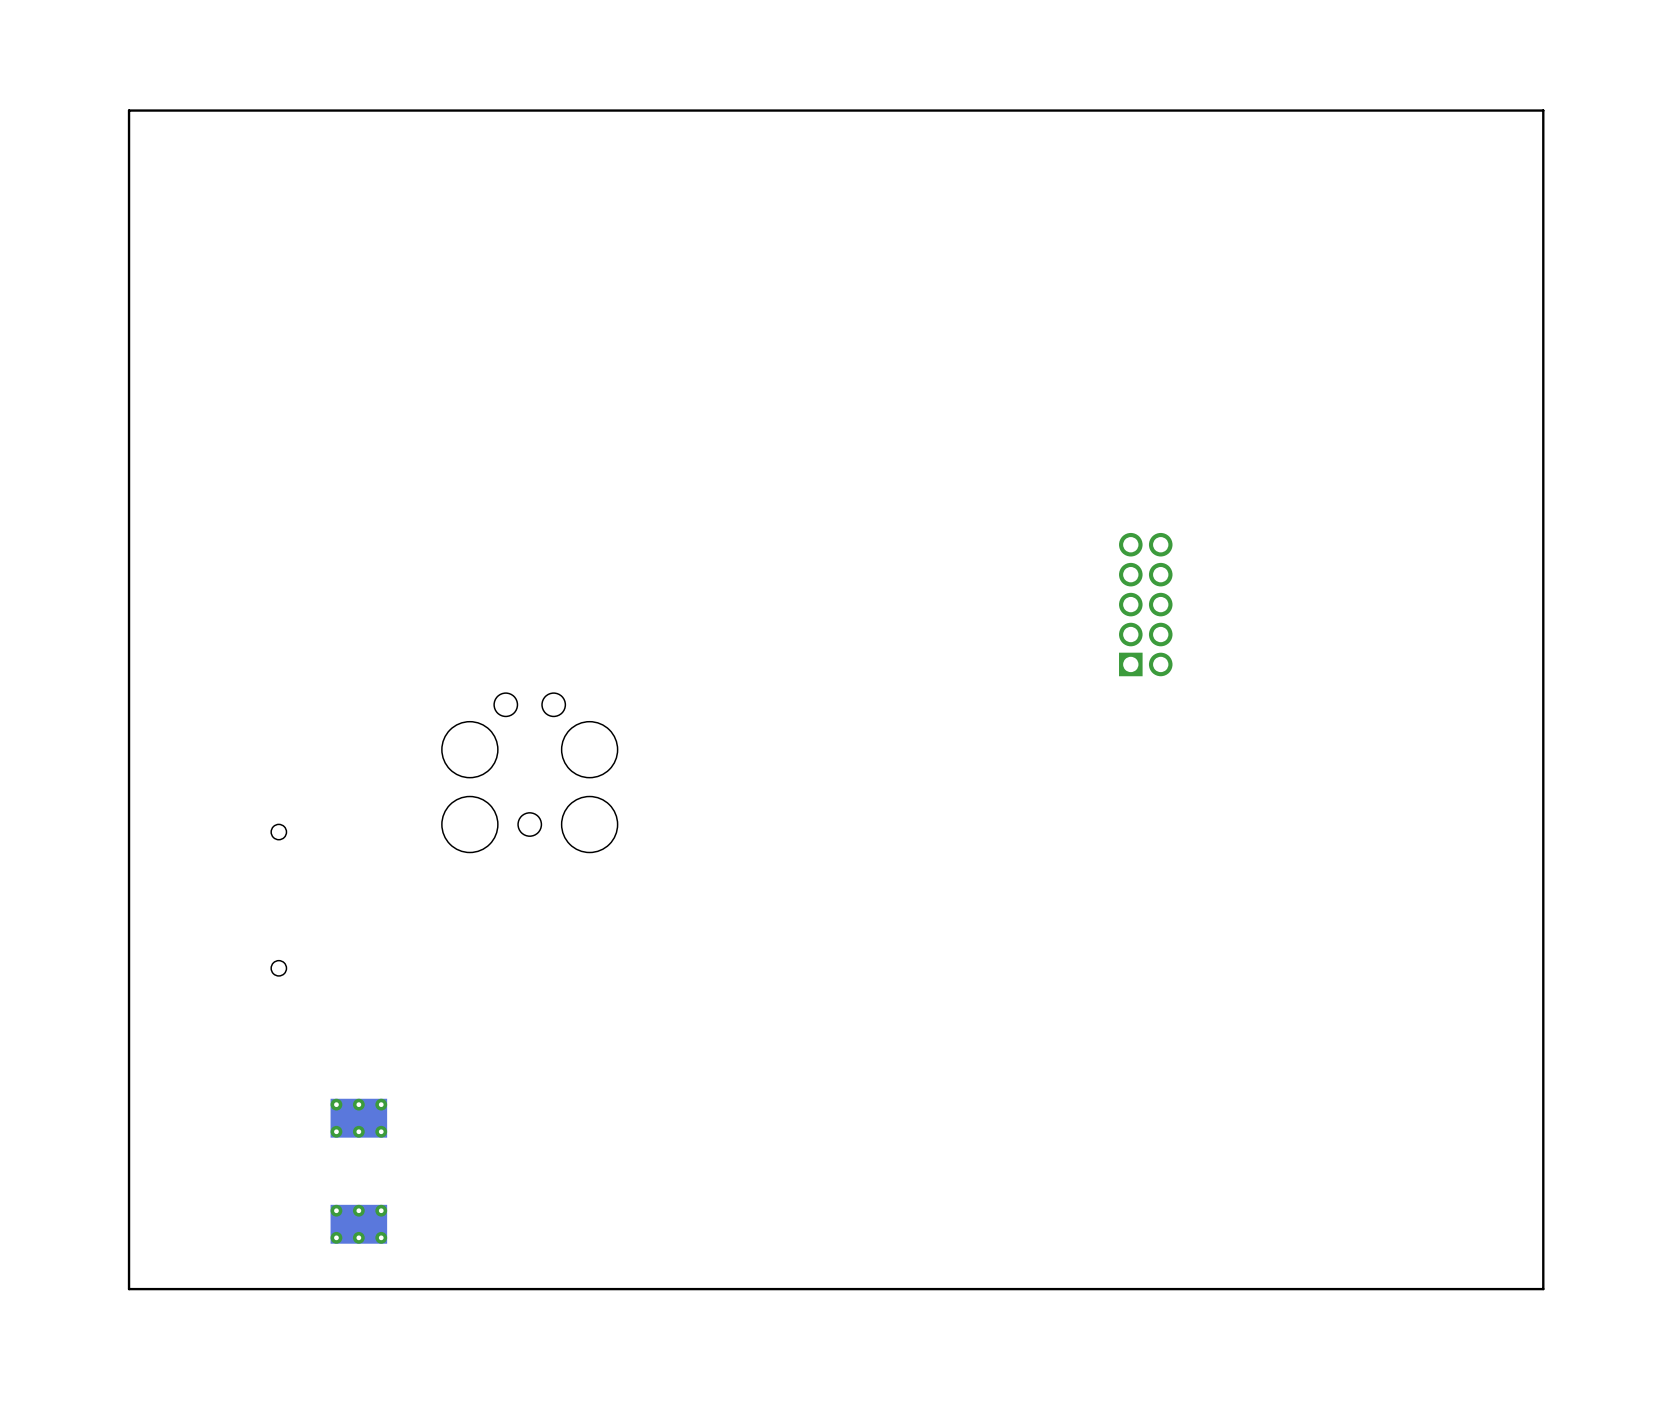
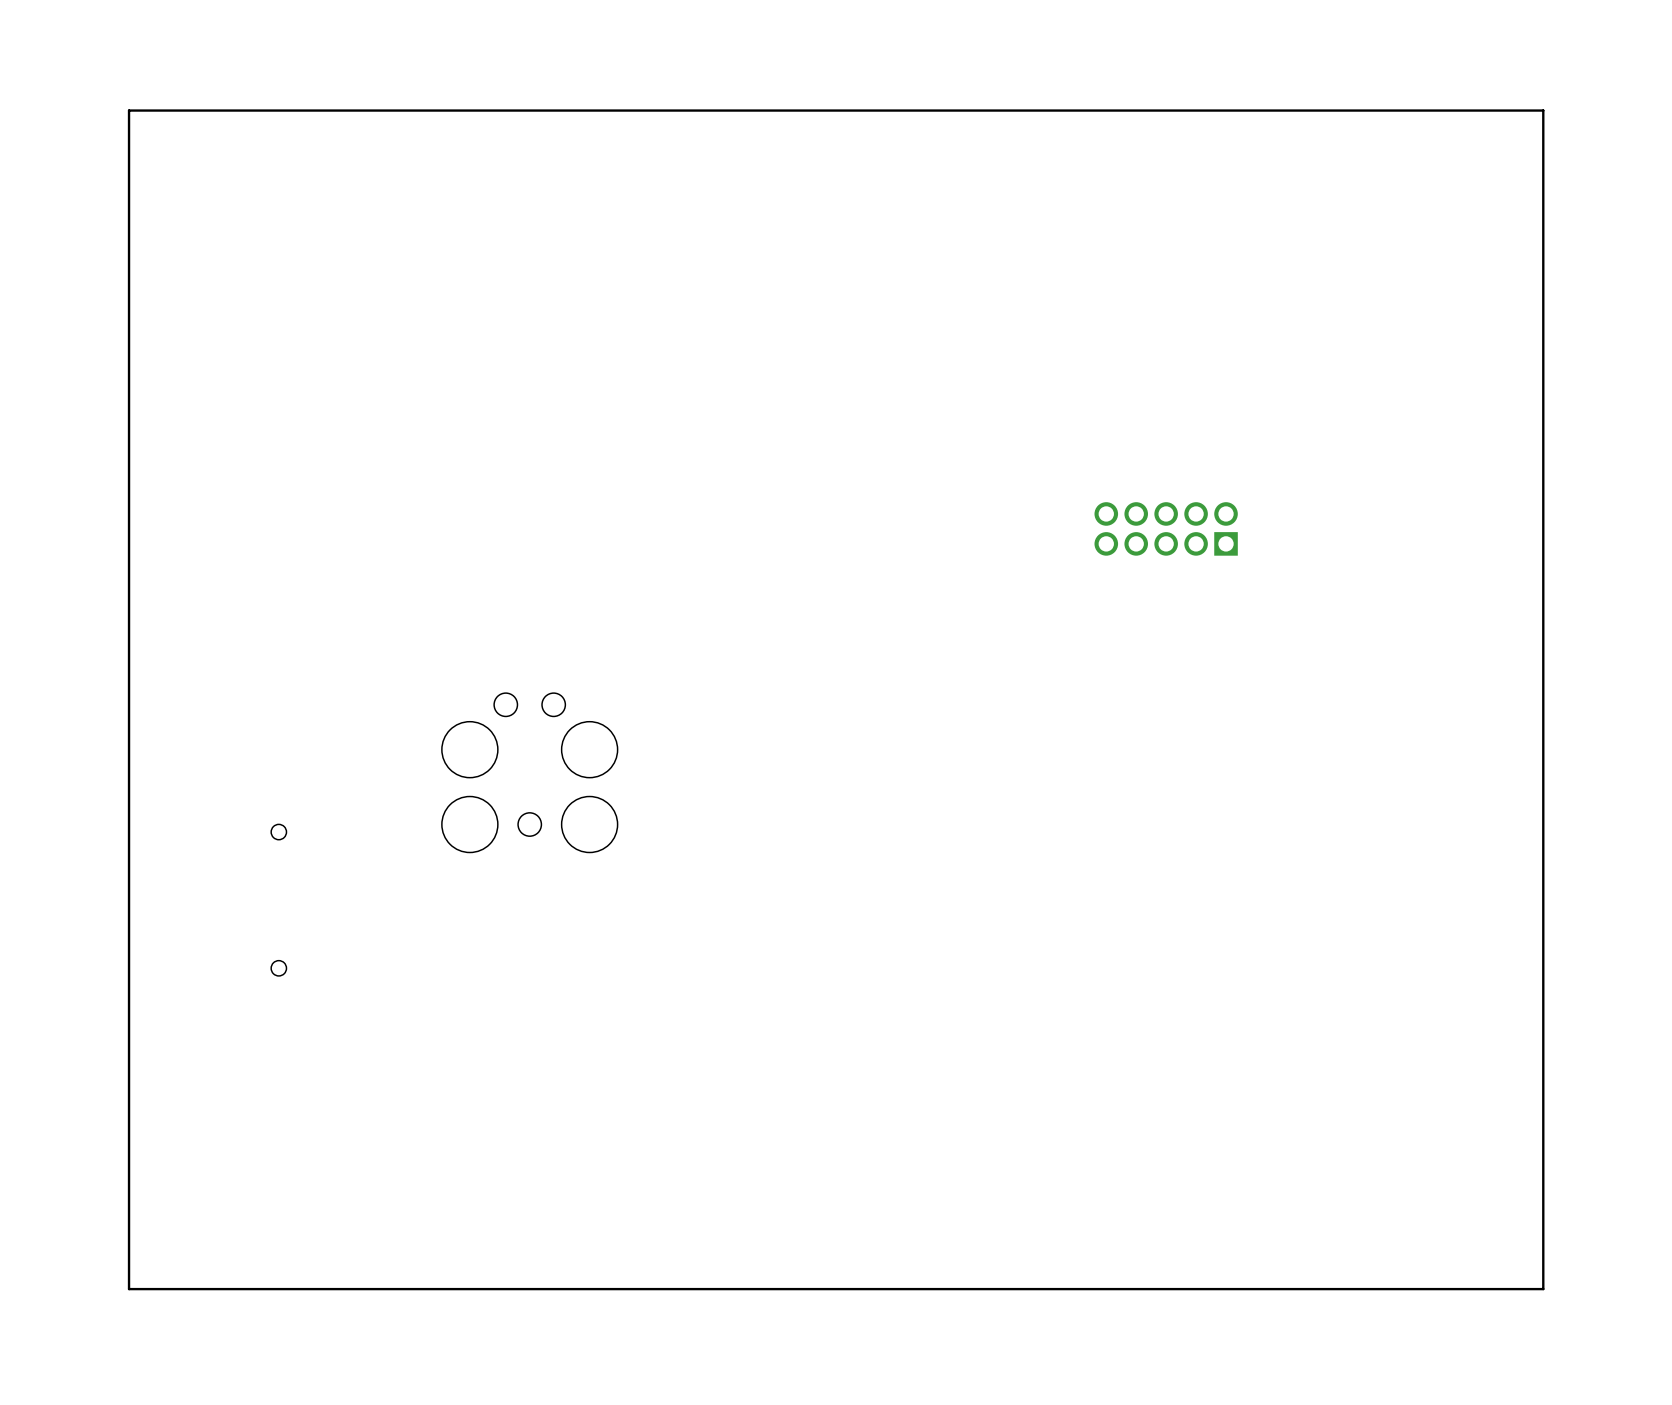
part rotation: 0° (1145, 604) -> 90° counterclockwise (1166, 528)
part: (358, 1118) -> none
part: (358, 1224) -> none

